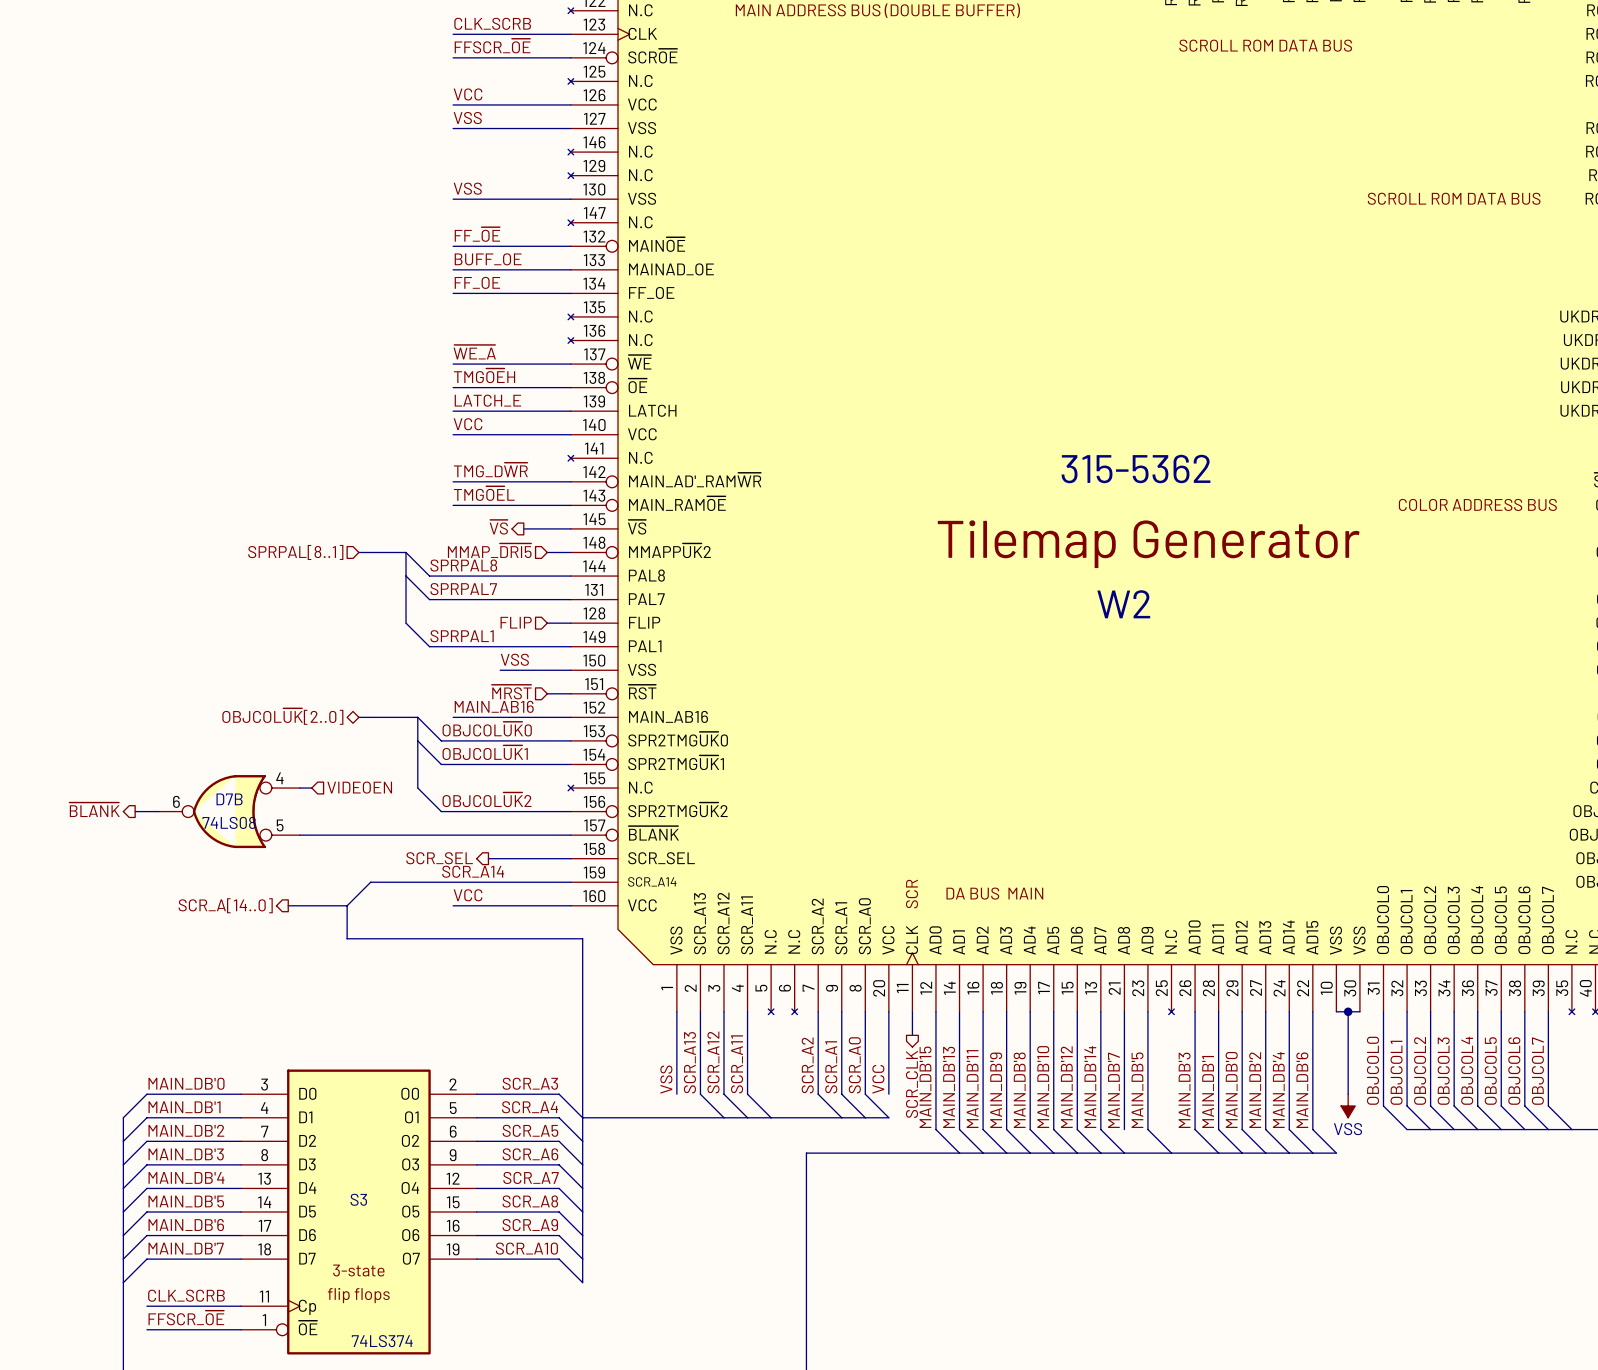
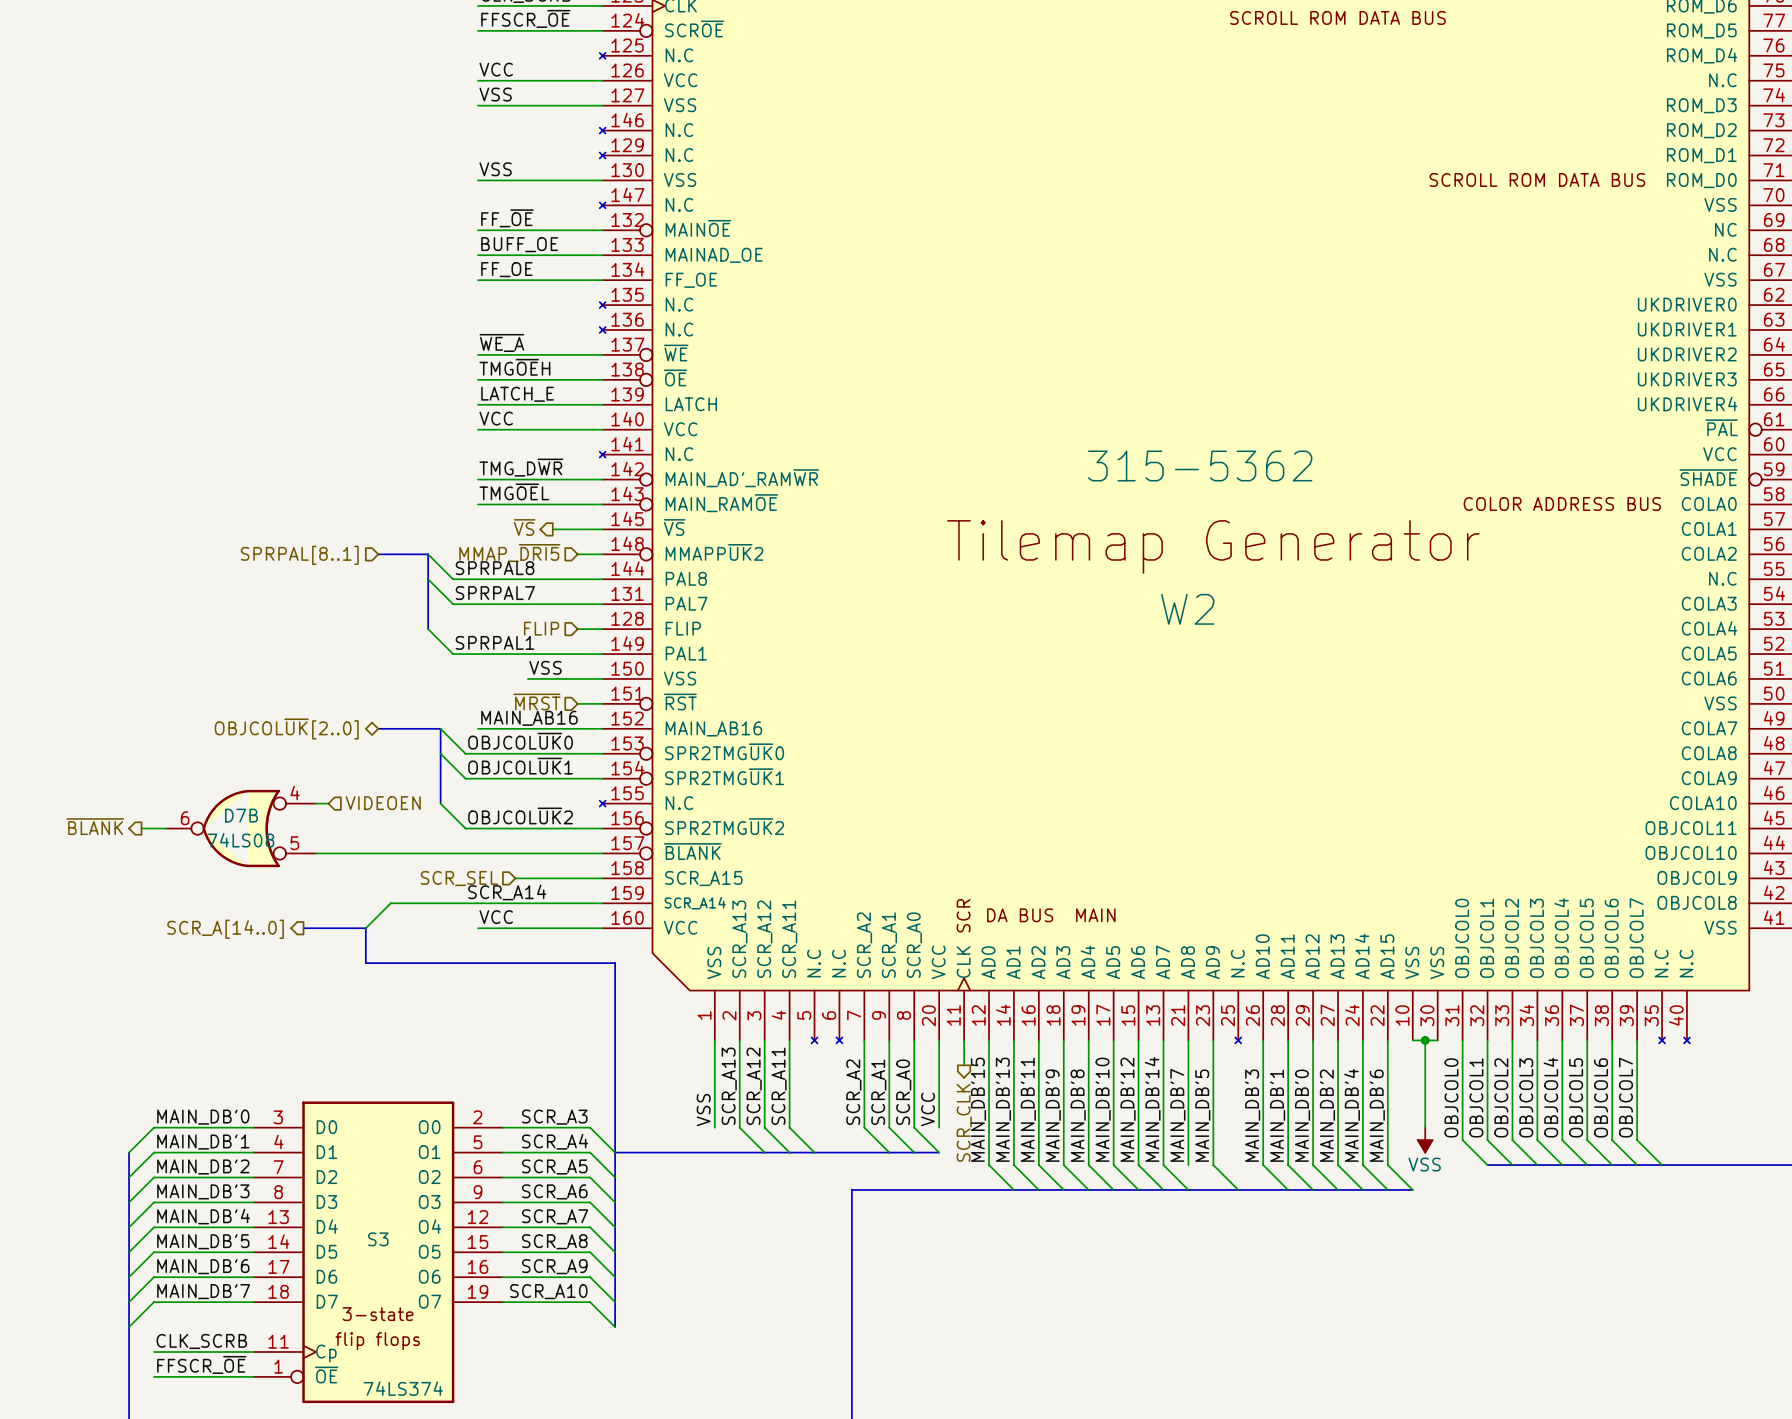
hierarchical label shape: output (439, 858) -> input (459, 878)
W2 pin name: SCR_SEL (661, 858) -> SCR_A15 (703, 878)

